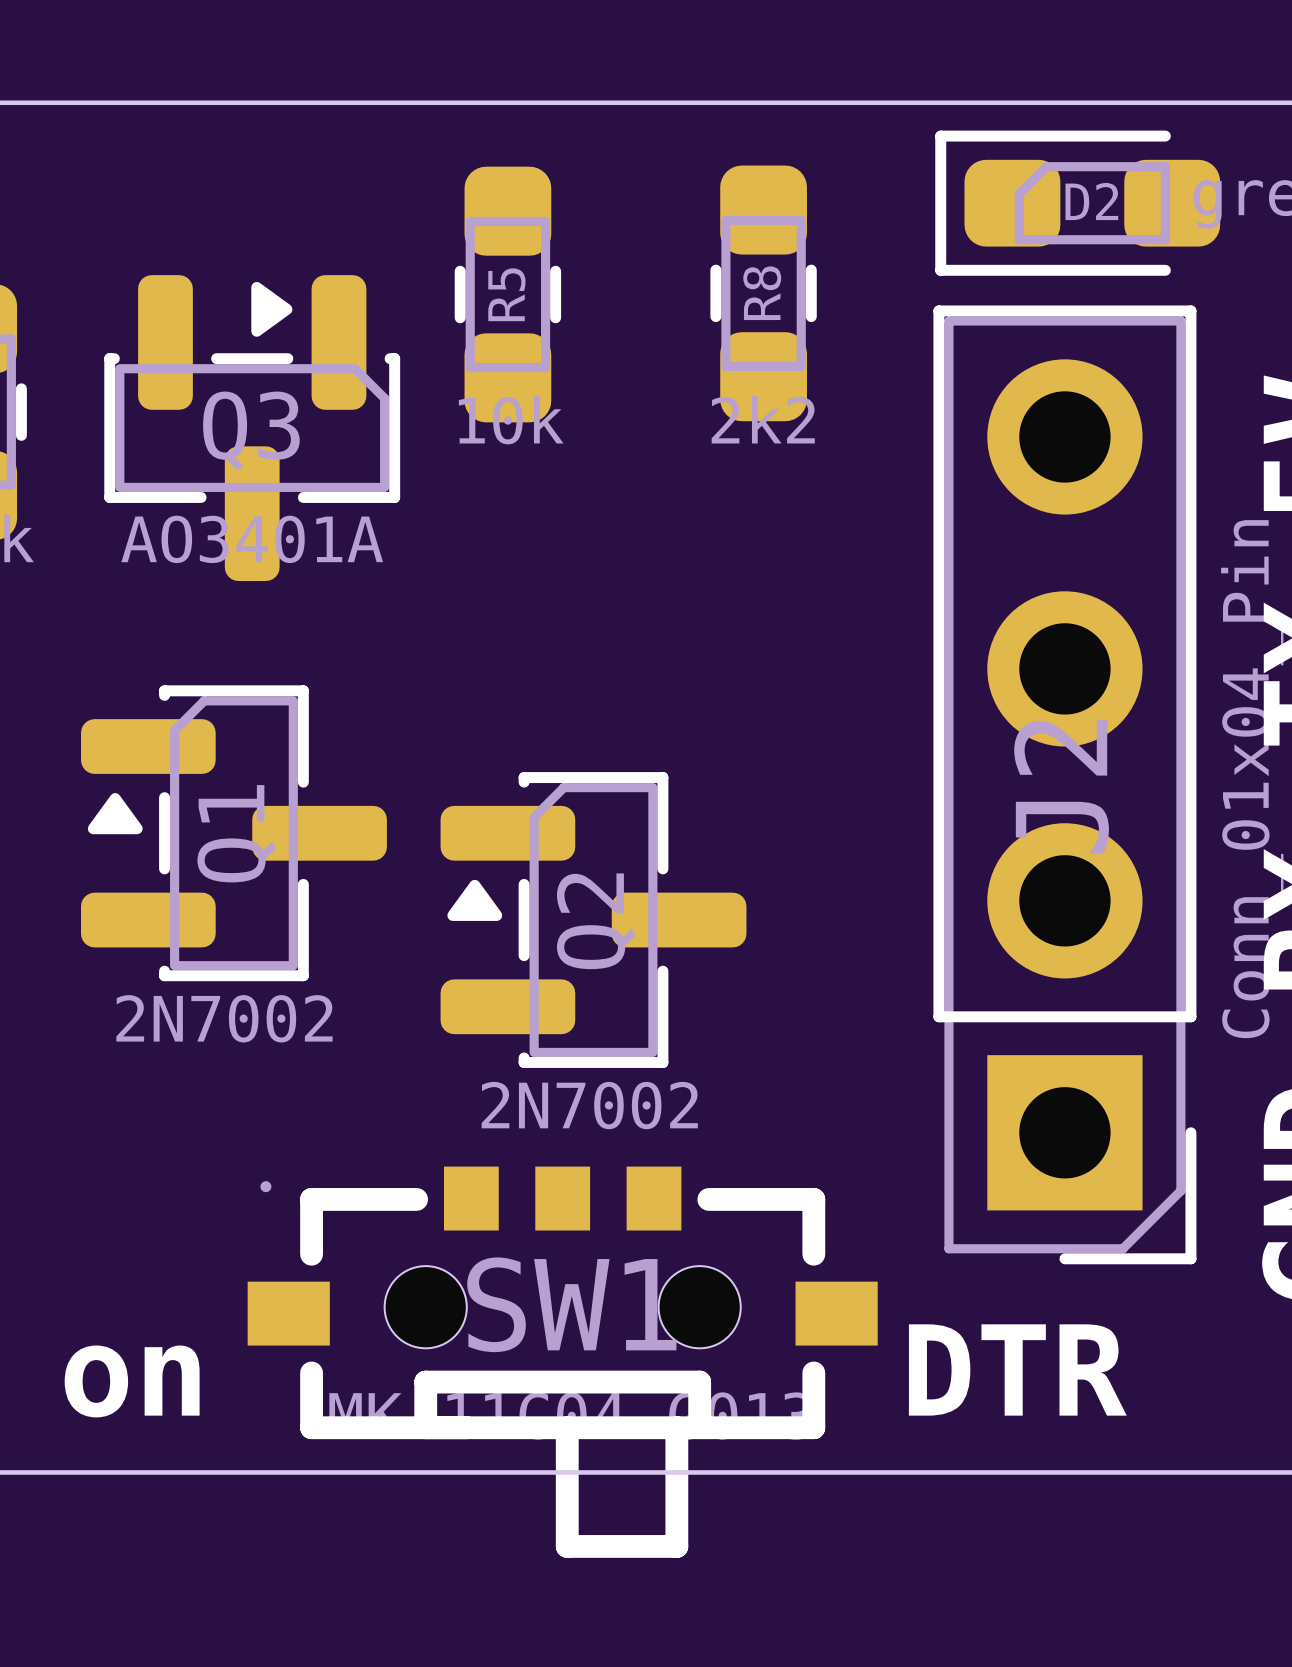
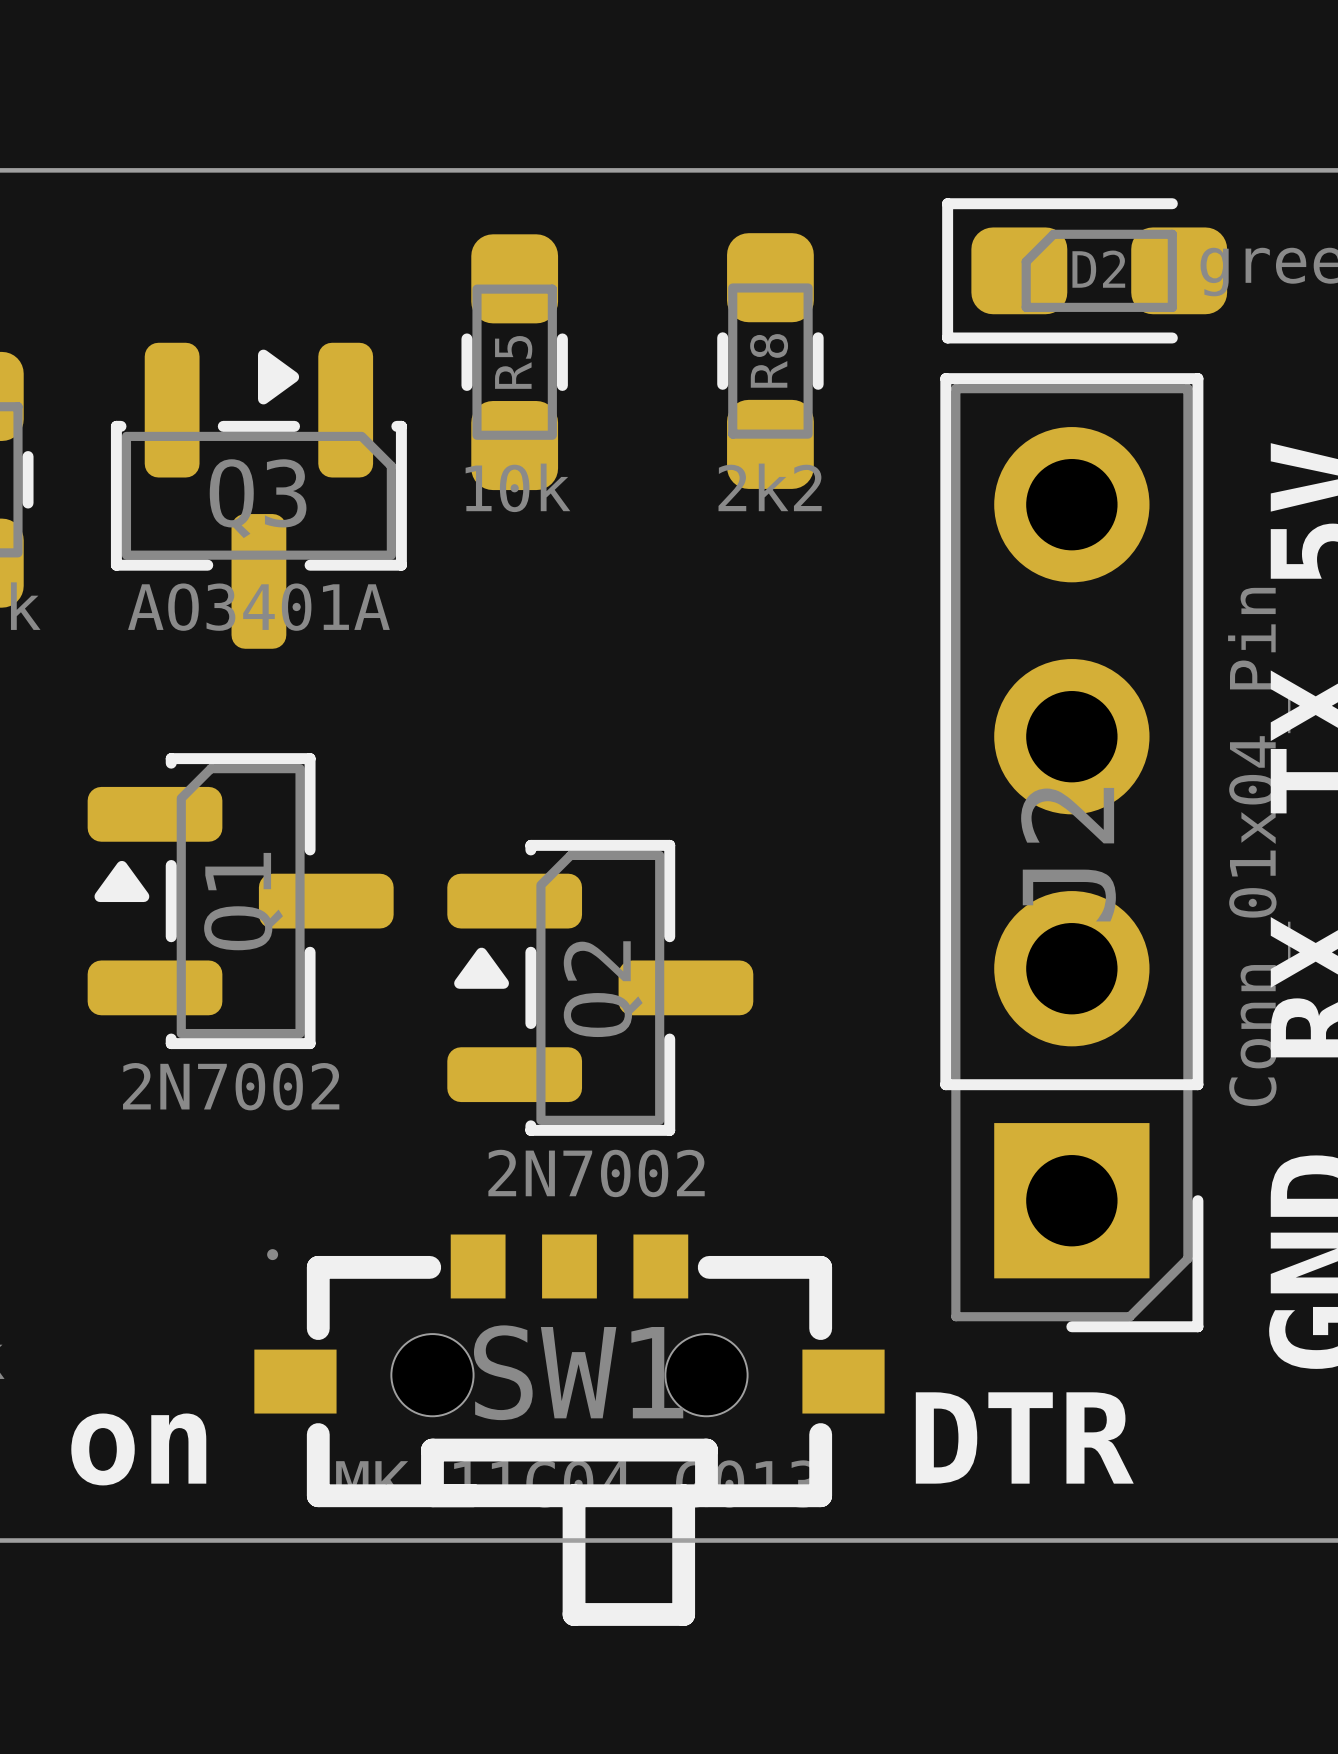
SW1 footprint: [247, 1166, 878, 1558] -> [254, 1234, 885, 1626]

